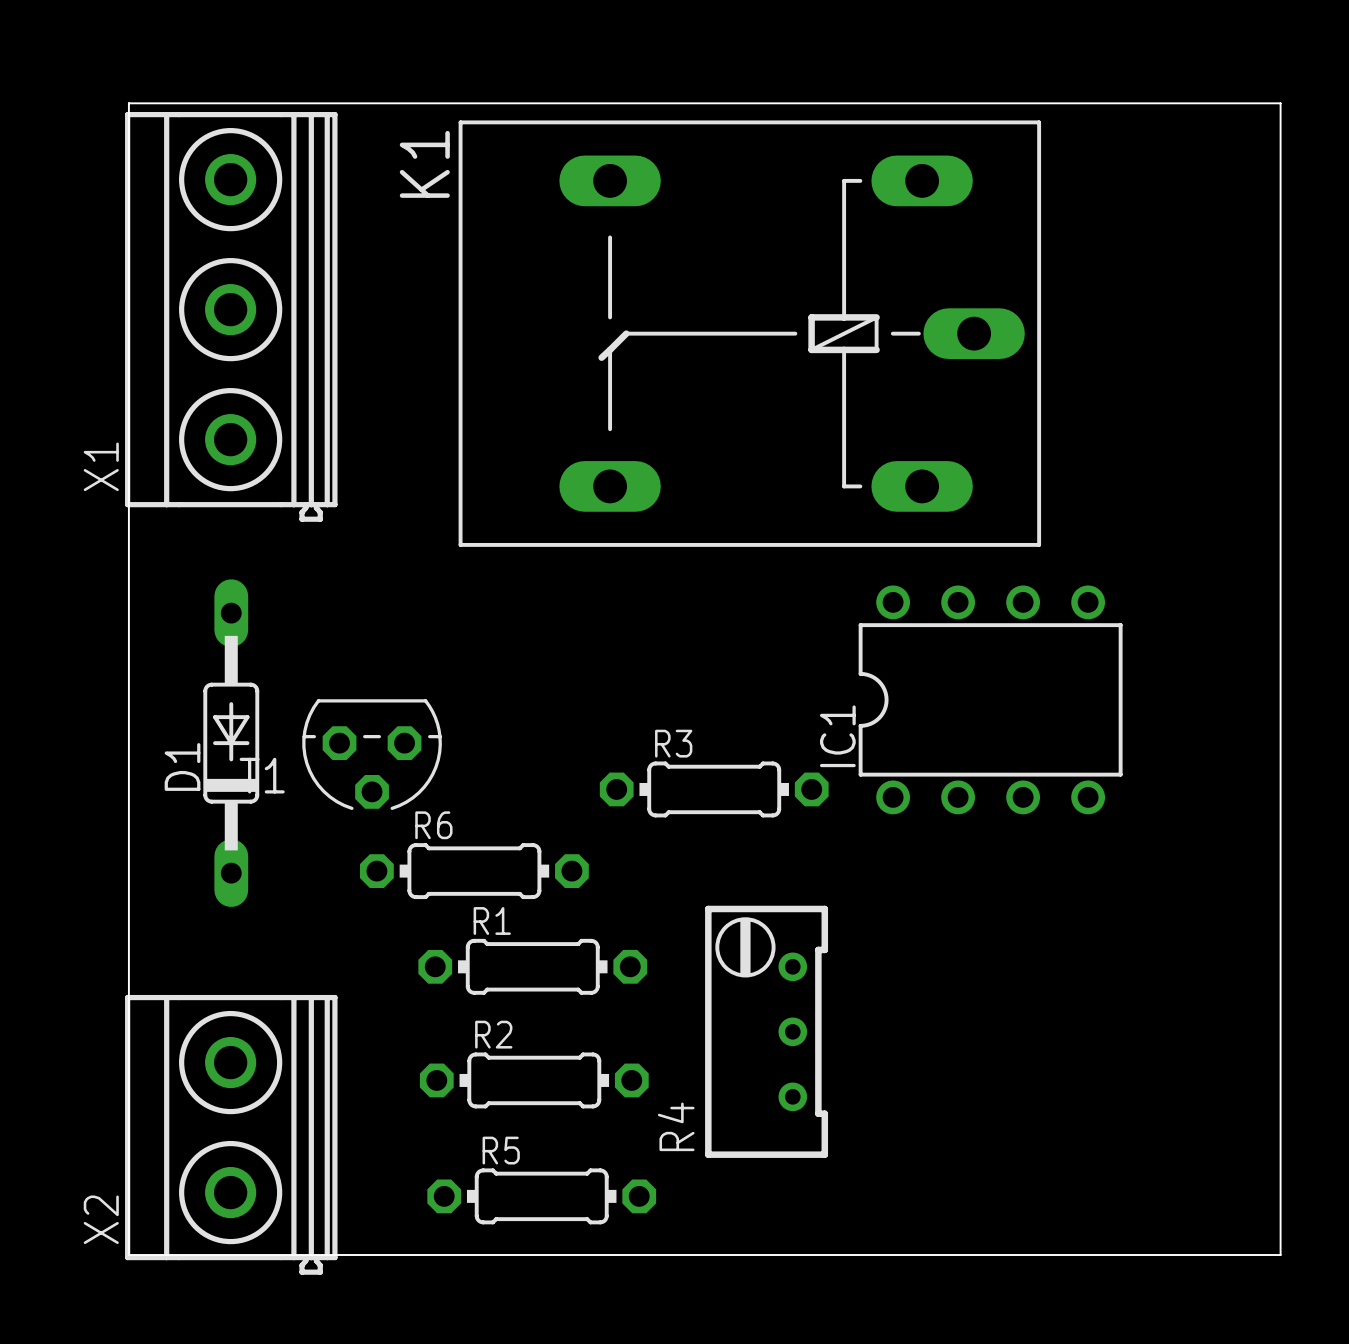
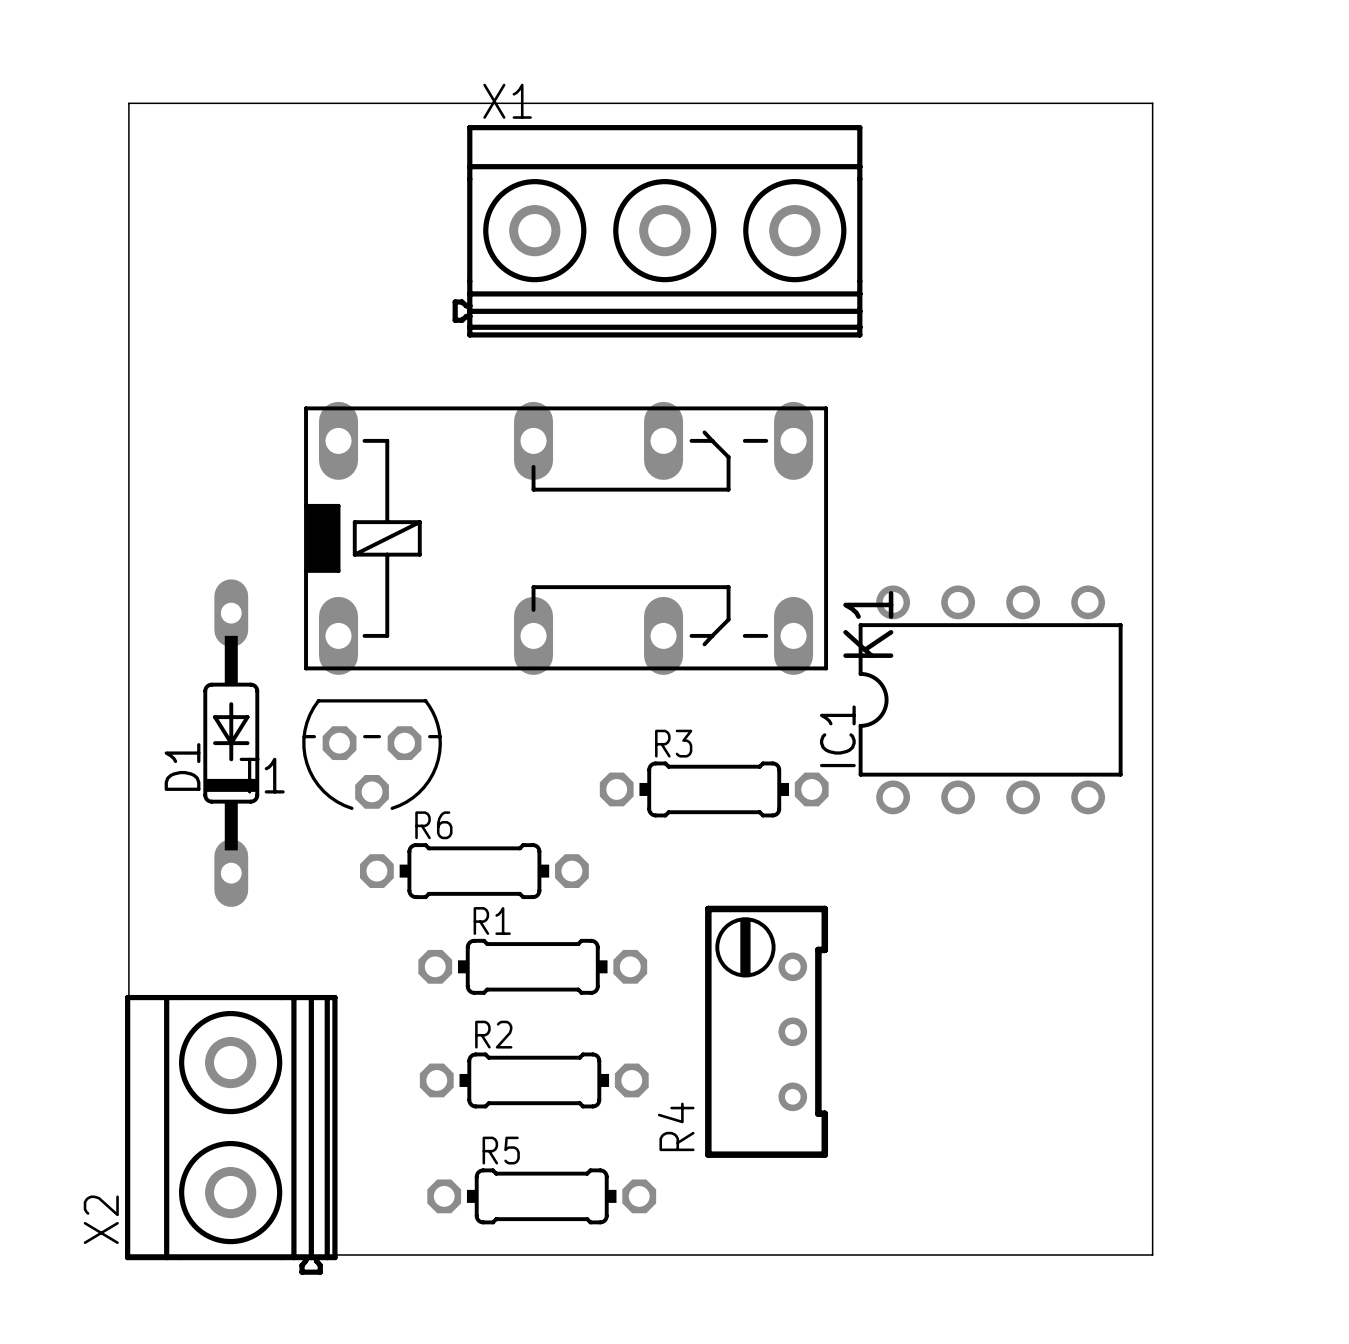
board edge: (1152, 103) (1280, 103) (1280, 1254) (1152, 1254) -> (1152, 103) (1152, 1254)
K1 footprint: [458, 120, 1042, 547] -> [304, 401, 829, 675]
K1 name position: K1 (424, 164) -> K1 (868, 624)
X1 rotation: 0° (231, 316) -> 90° clockwise (657, 231)
X1 position: (231, 316) -> (657, 231)

